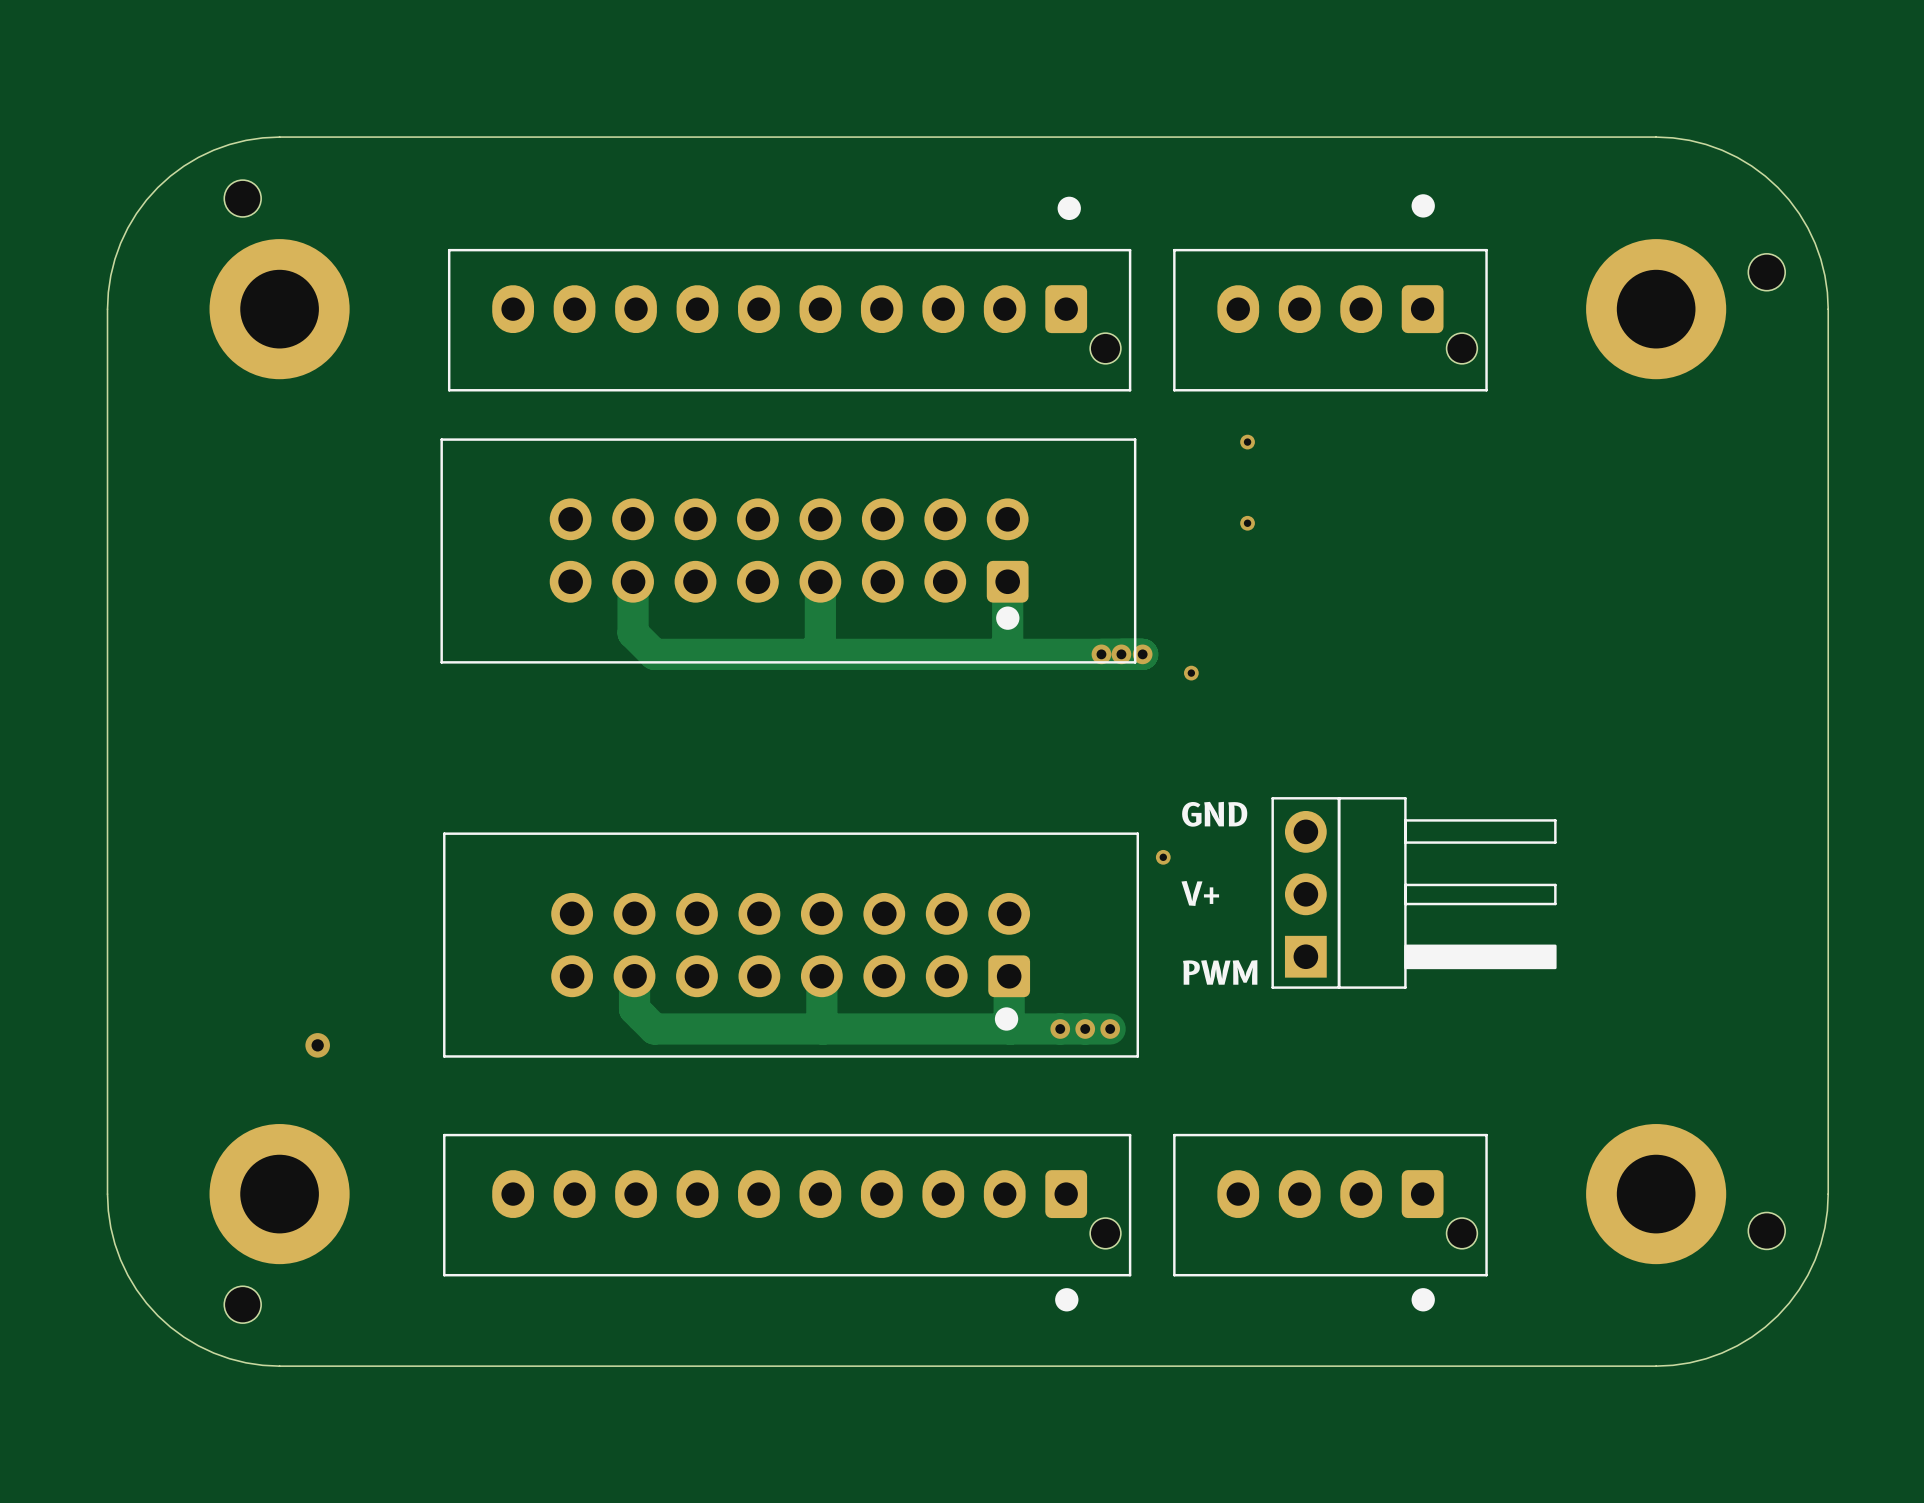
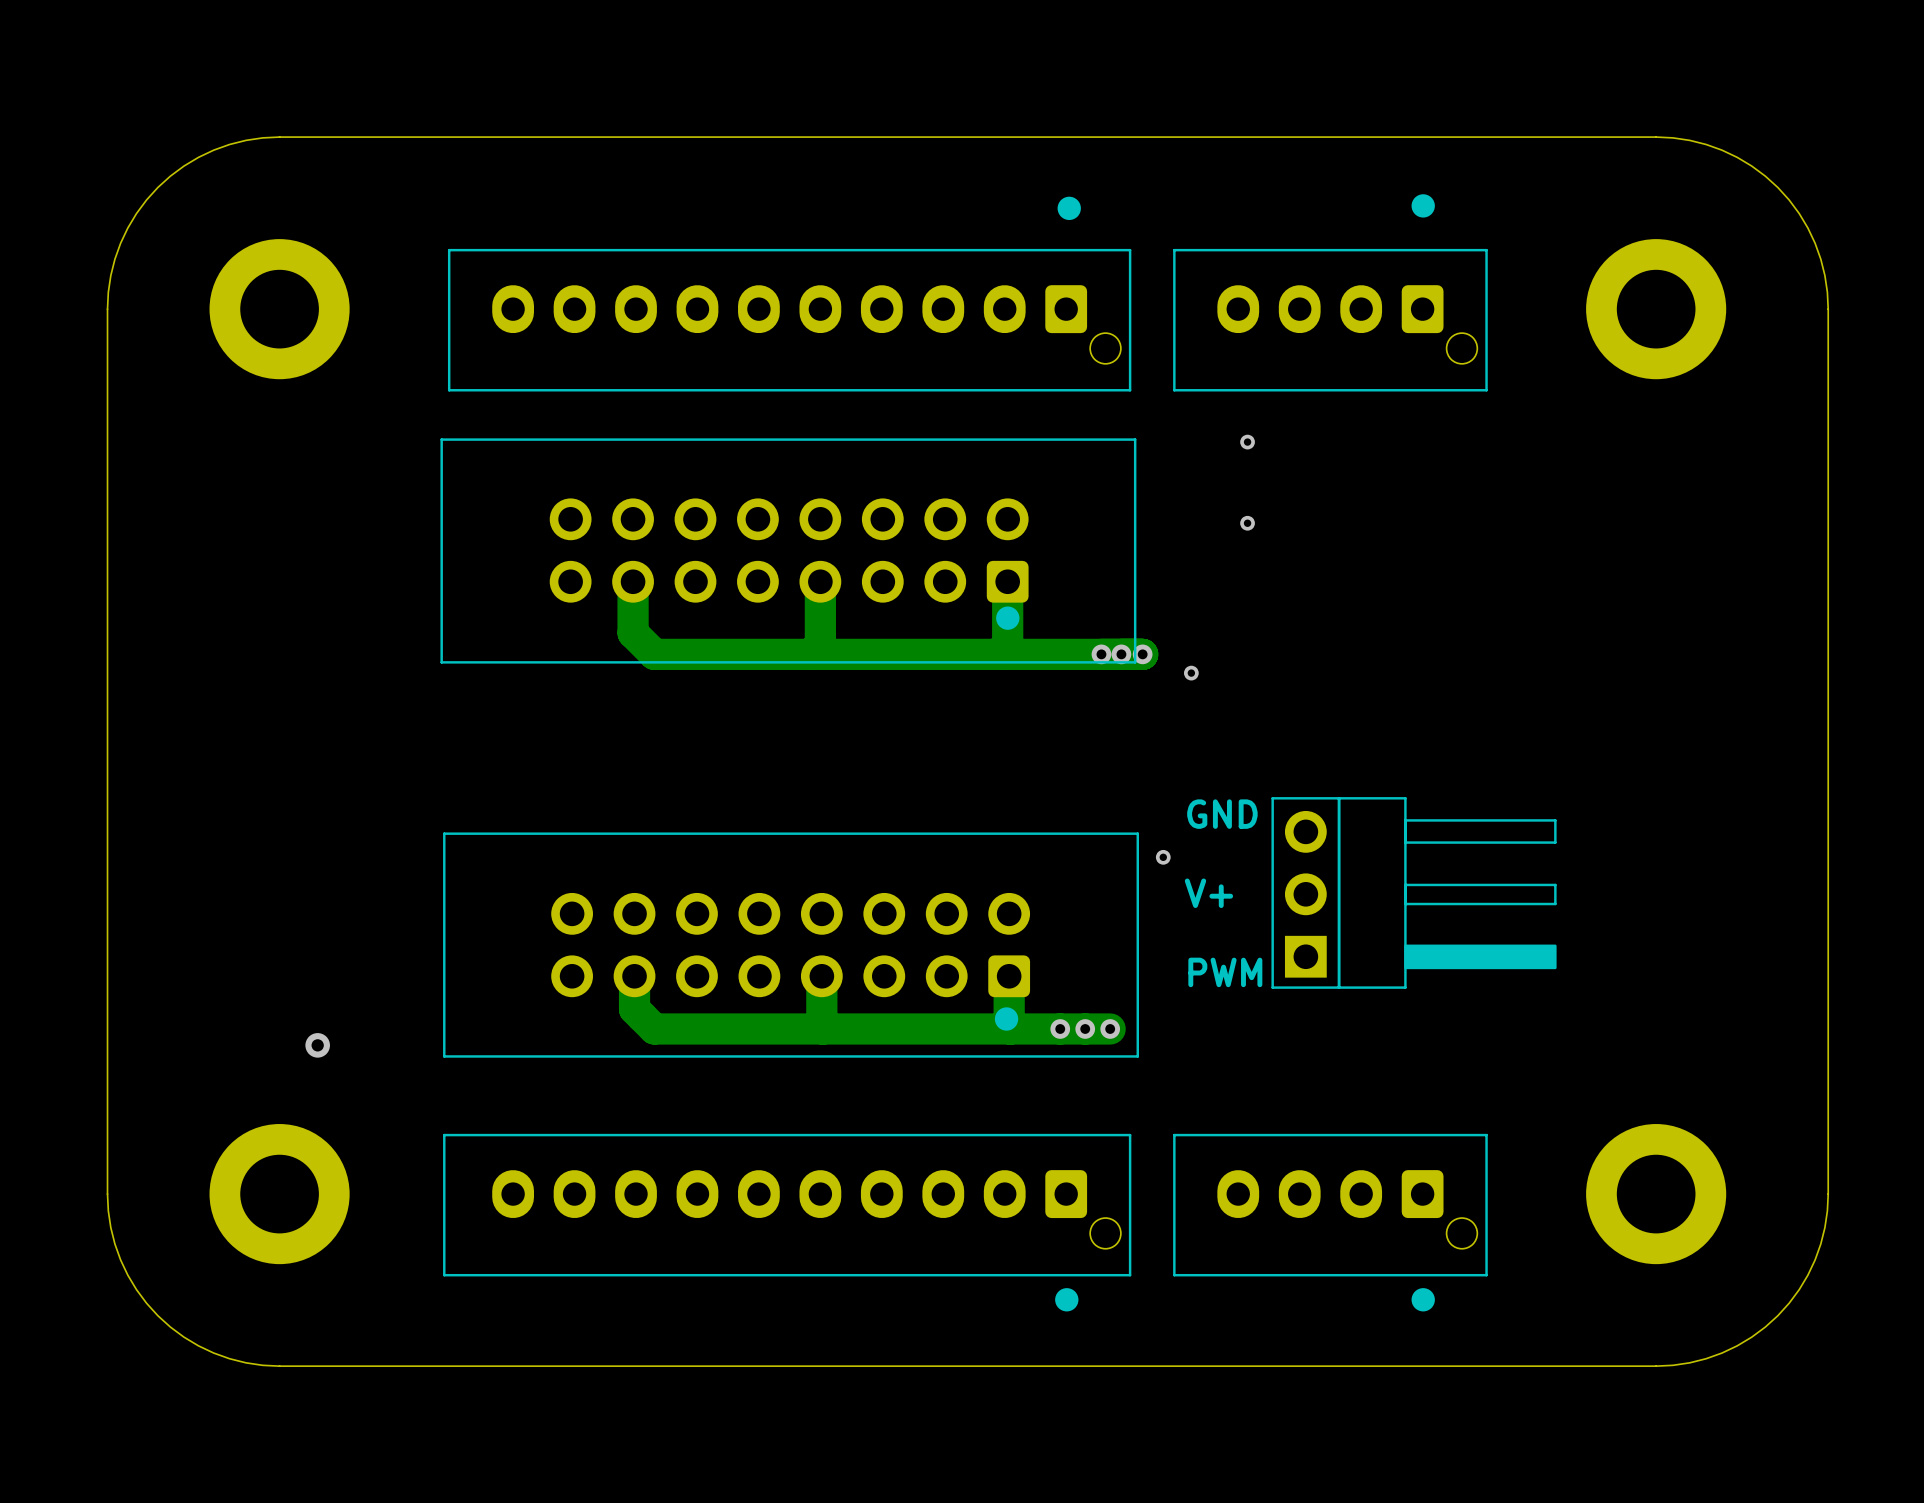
part: (242, 198) -> none
part: (1766, 272) -> none
part: (1766, 1230) -> none
part: (242, 1304) -> none

